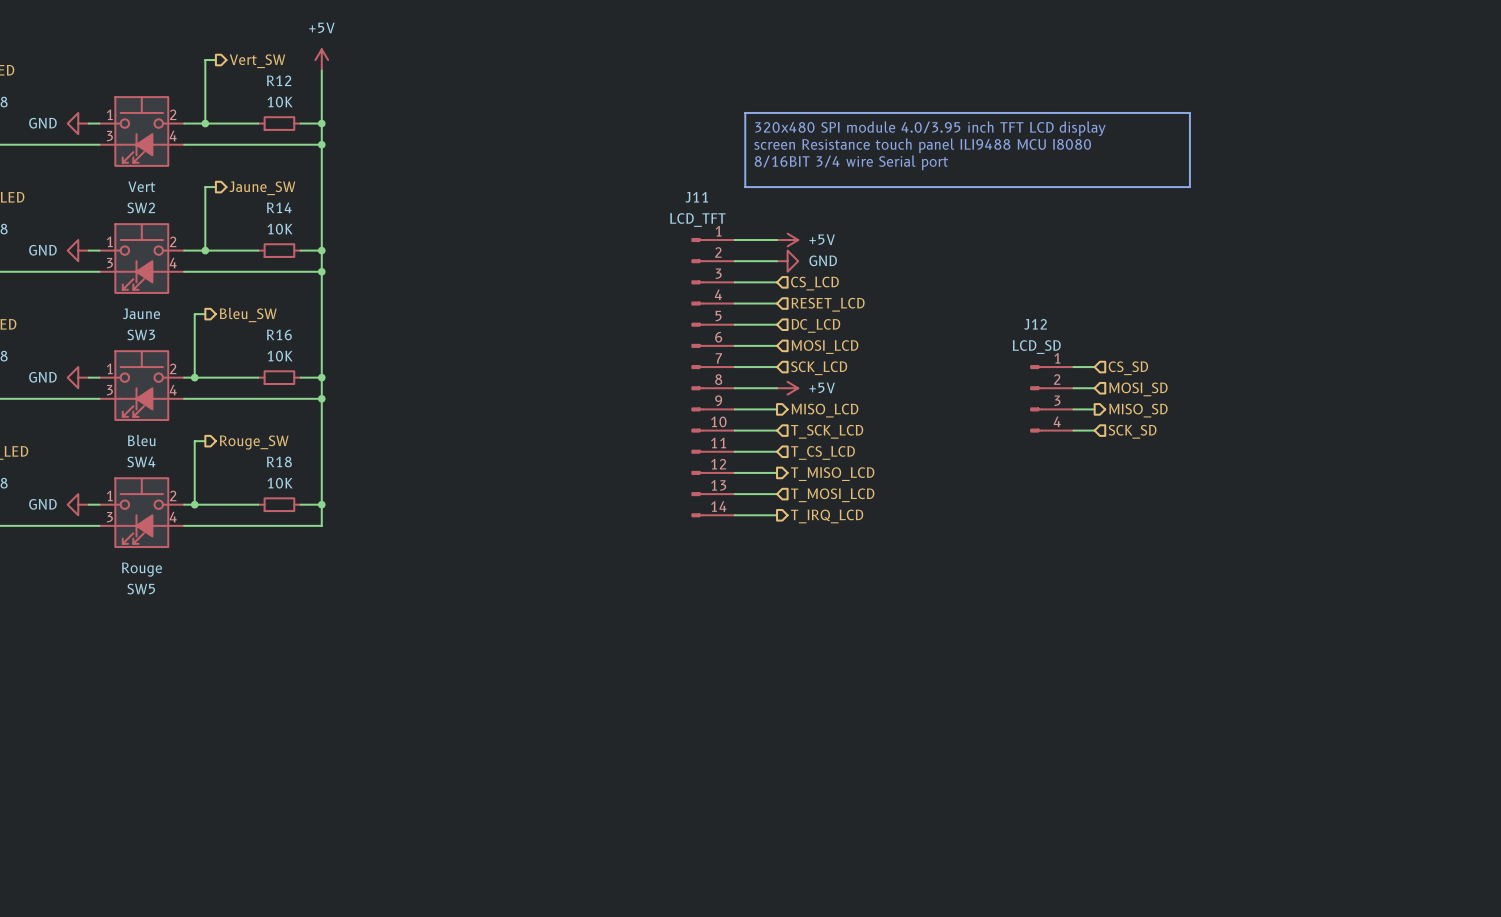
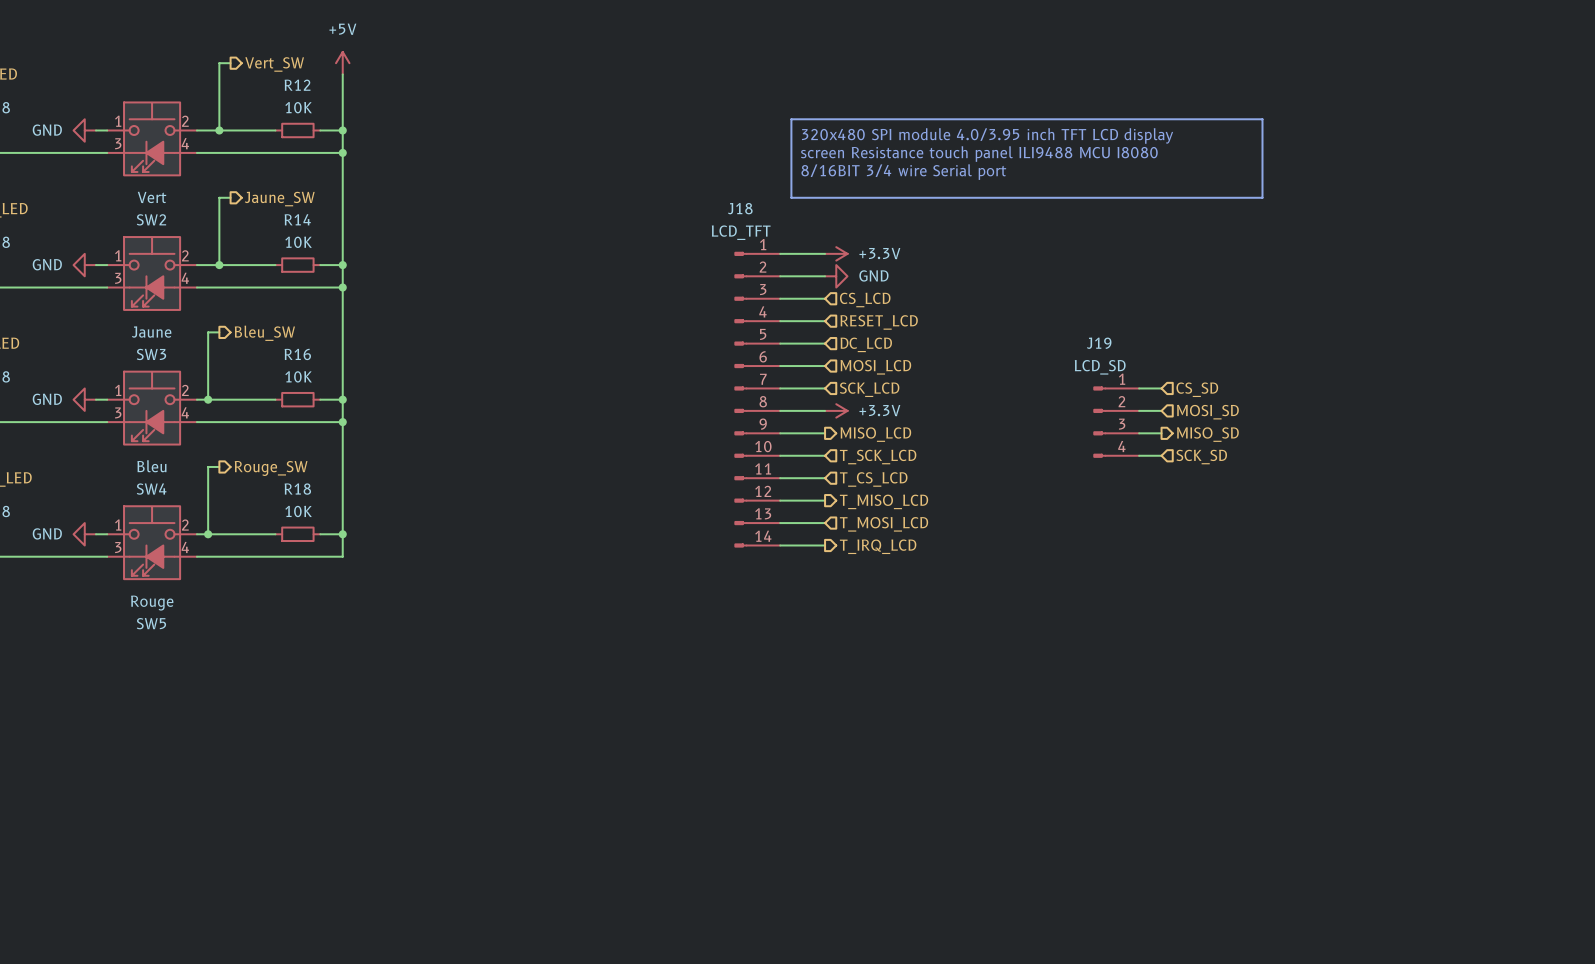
J11 name: J11 (696, 197) -> J18 (740, 208)
power symbol: +5V (787, 240) -> +3.3V (836, 253)
J12 name: J12 (1035, 324) -> J19 (1099, 343)
power symbol: +5V (787, 388) -> +3.3V (836, 410)

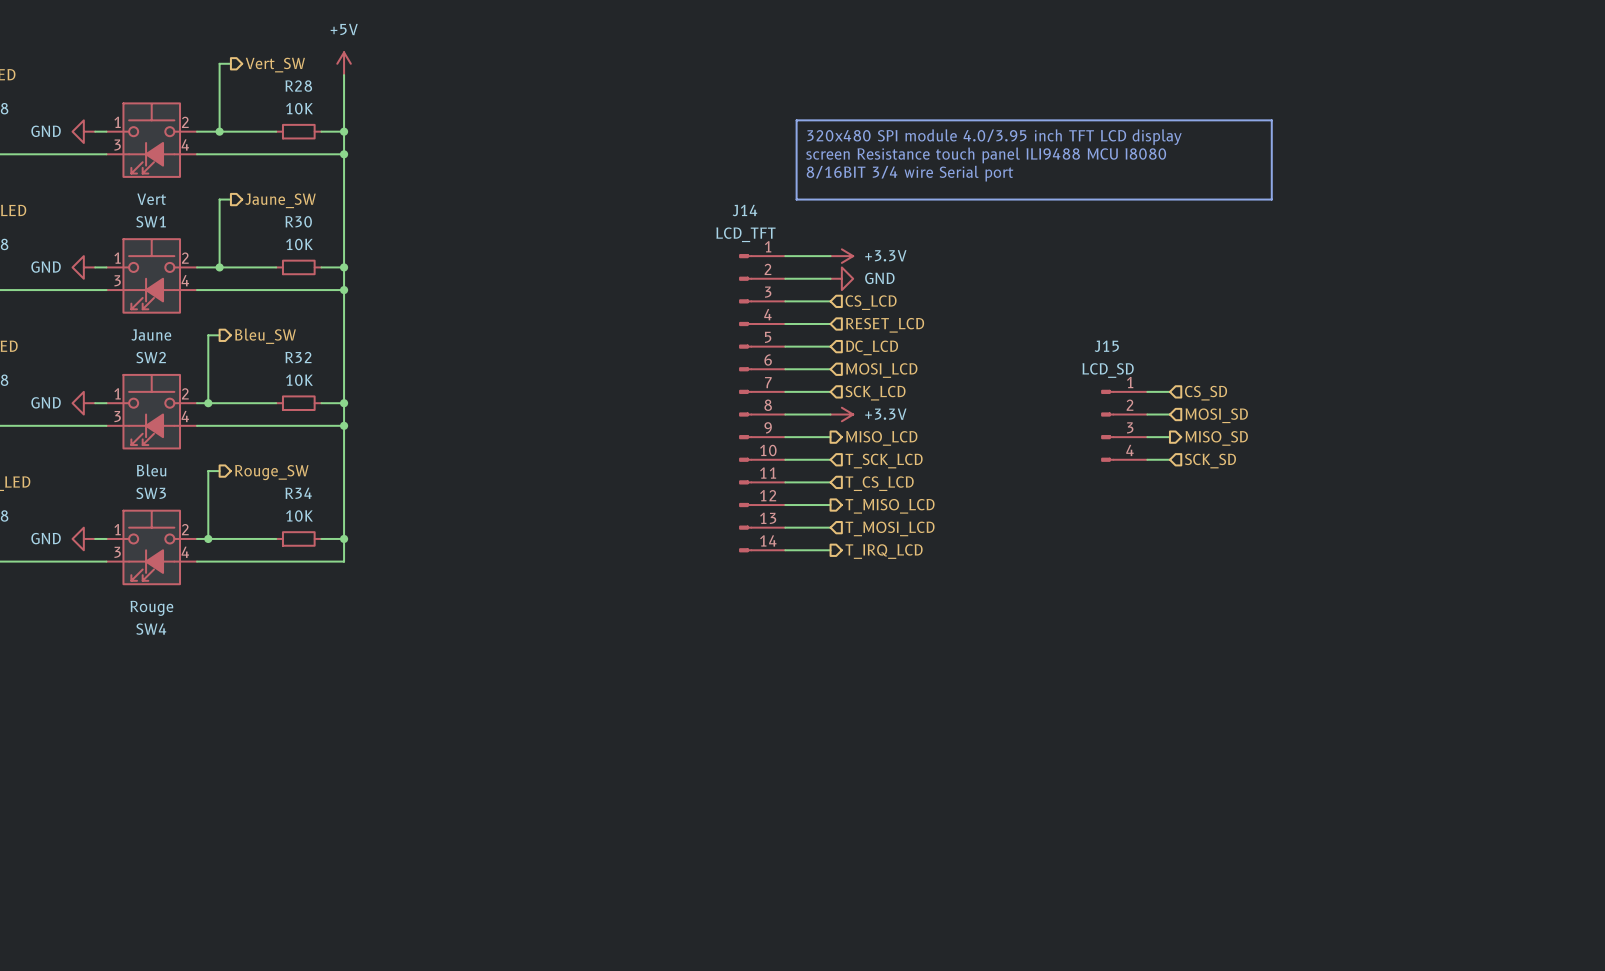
R12 name: R12 (297, 85) -> R28 (298, 86)
J18 name: J18 (740, 208) -> J14 (744, 210)
SW2 name: SW2 (151, 219) -> SW1 (151, 221)
R14 name: R14 (297, 219) -> R30 (298, 221)
J19 name: J19 (1099, 343) -> J15 (1106, 346)
SW3 name: SW3 (151, 354) -> SW2 (151, 357)
R16 name: R16 (297, 354) -> R32 (298, 357)
SW4 name: SW4 (151, 489) -> SW3 (151, 493)
R18 name: R18 (297, 489) -> R34 (298, 493)
SW5 name: SW5 (151, 623) -> SW4 (151, 629)

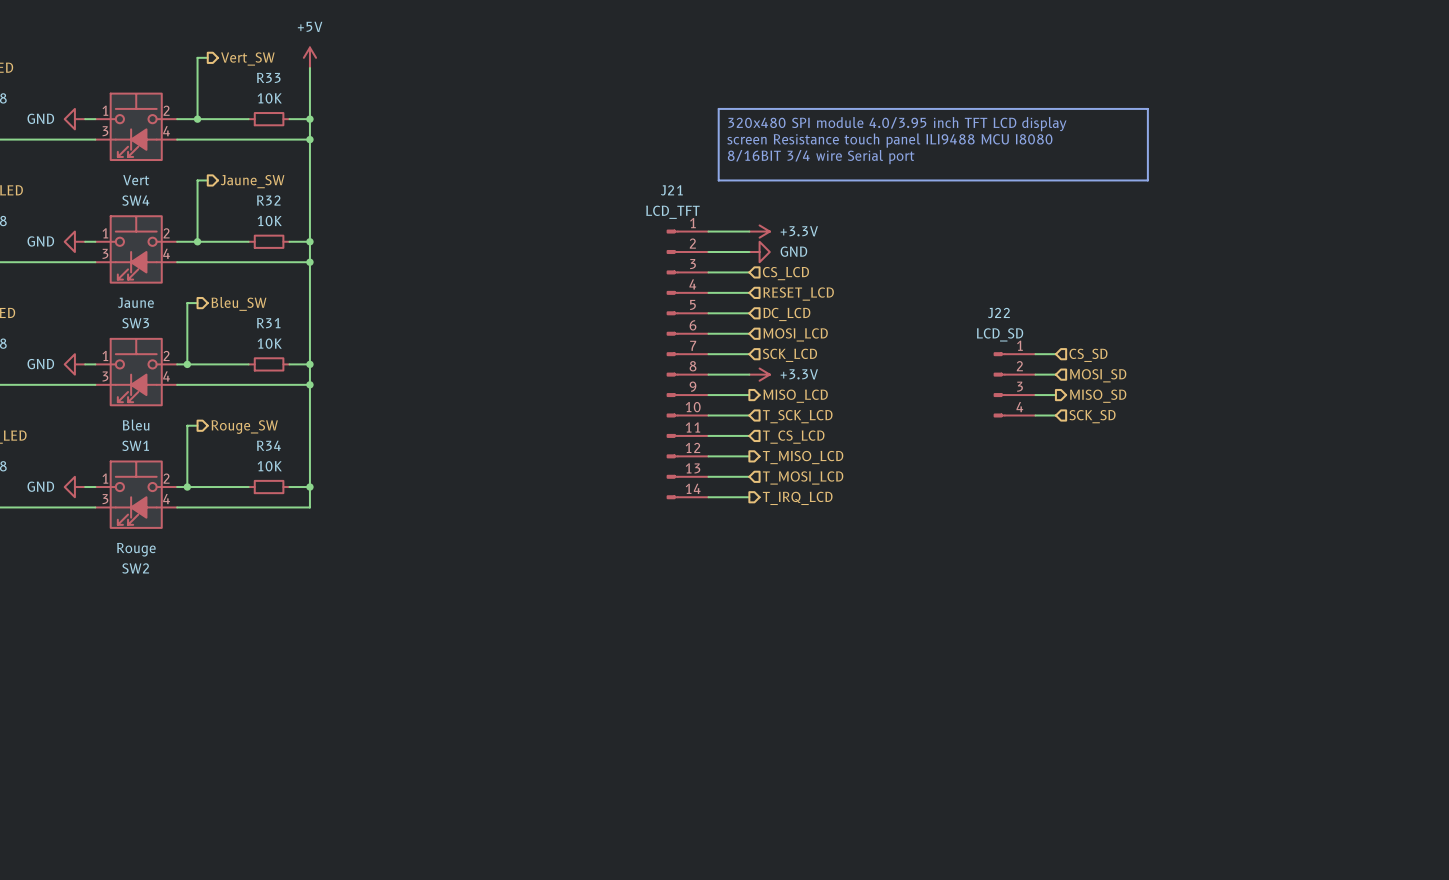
R28 name: R28 (298, 86) -> R33 (268, 77)
J14 name: J14 (744, 210) -> J21 (671, 190)
SW1 name: SW1 (151, 221) -> SW4 (135, 200)
R30 name: R30 (298, 221) -> R32 (268, 200)
J15 name: J15 (1106, 346) -> J22 (998, 312)
SW2 name: SW2 (151, 357) -> SW3 (135, 323)
R32 name: R32 (298, 357) -> R31 (268, 323)
SW3 name: SW3 (151, 493) -> SW1 (135, 445)
SW4 name: SW4 (151, 629) -> SW2 (135, 568)

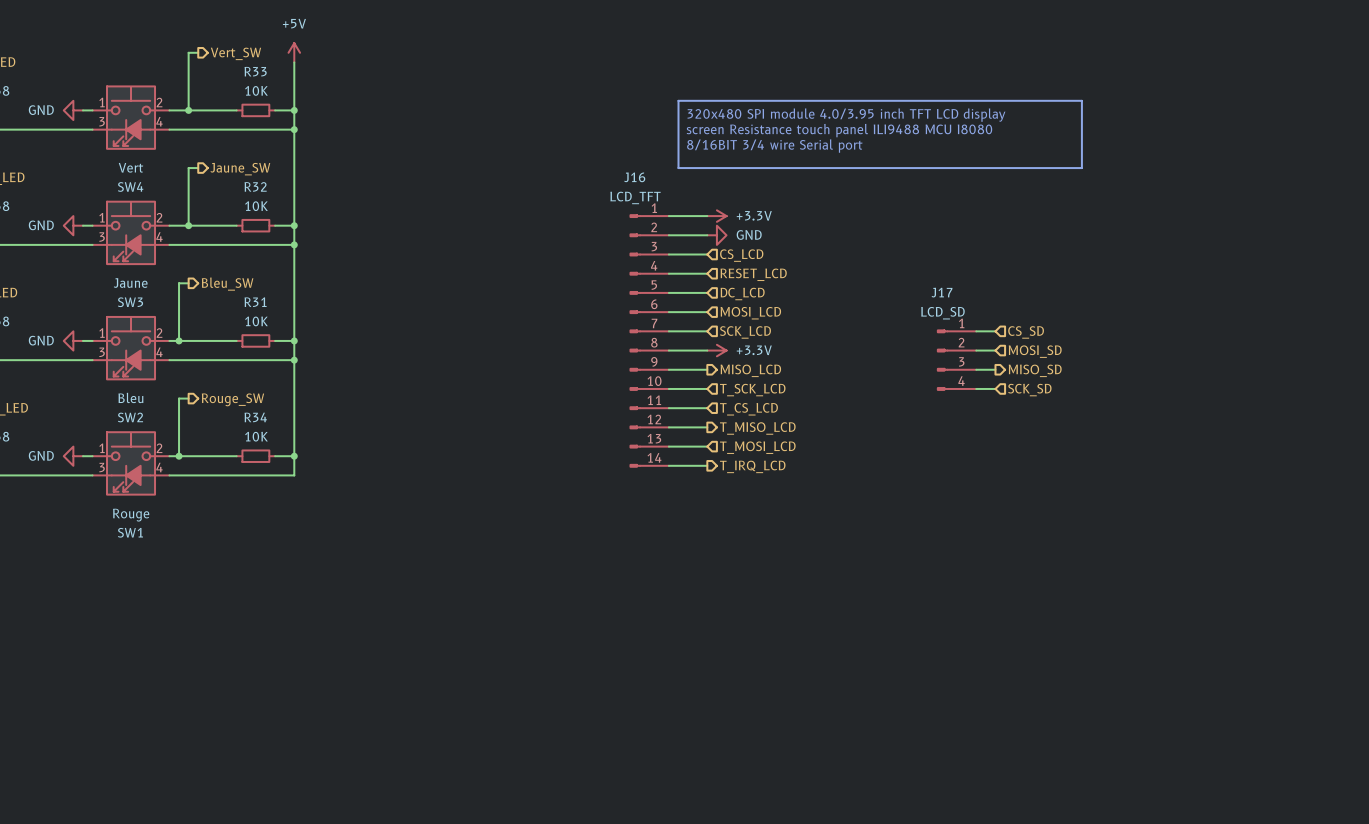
J21 name: J21 (671, 190) -> J16 (634, 177)
J22 name: J22 (998, 312) -> J17 (942, 292)
SW1 name: SW1 (135, 445) -> SW2 (130, 417)
SW2 name: SW2 (135, 568) -> SW1 (130, 532)

